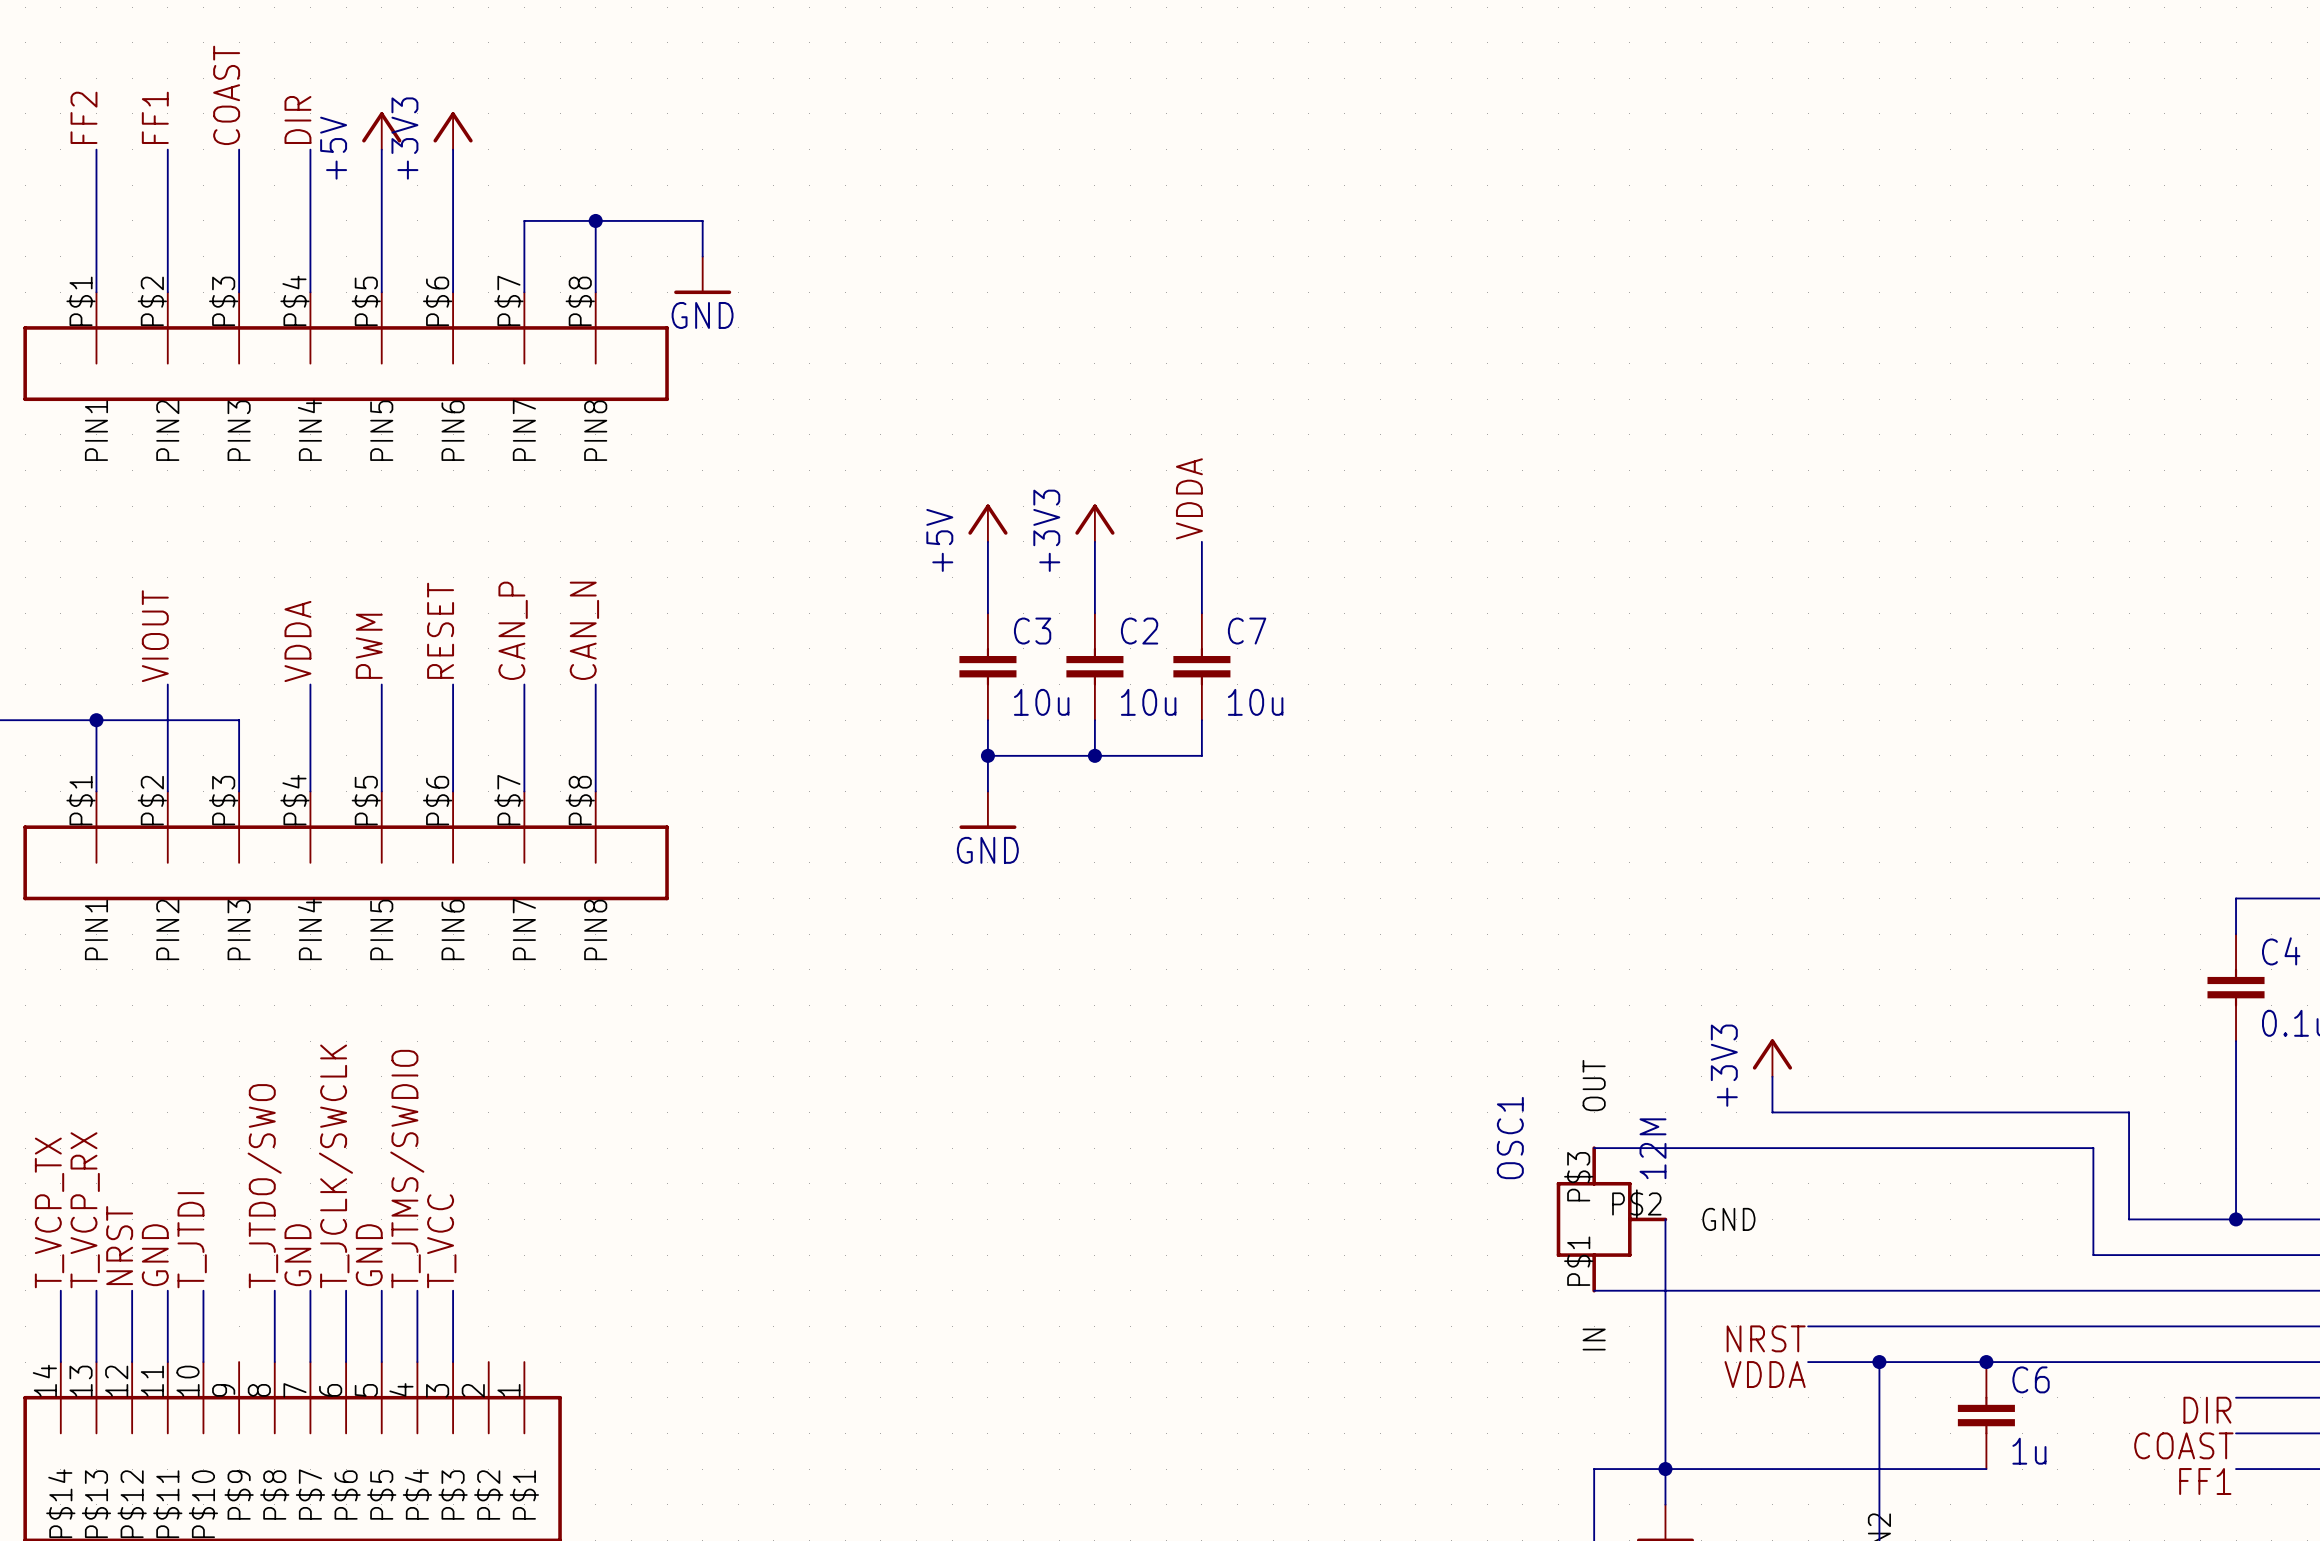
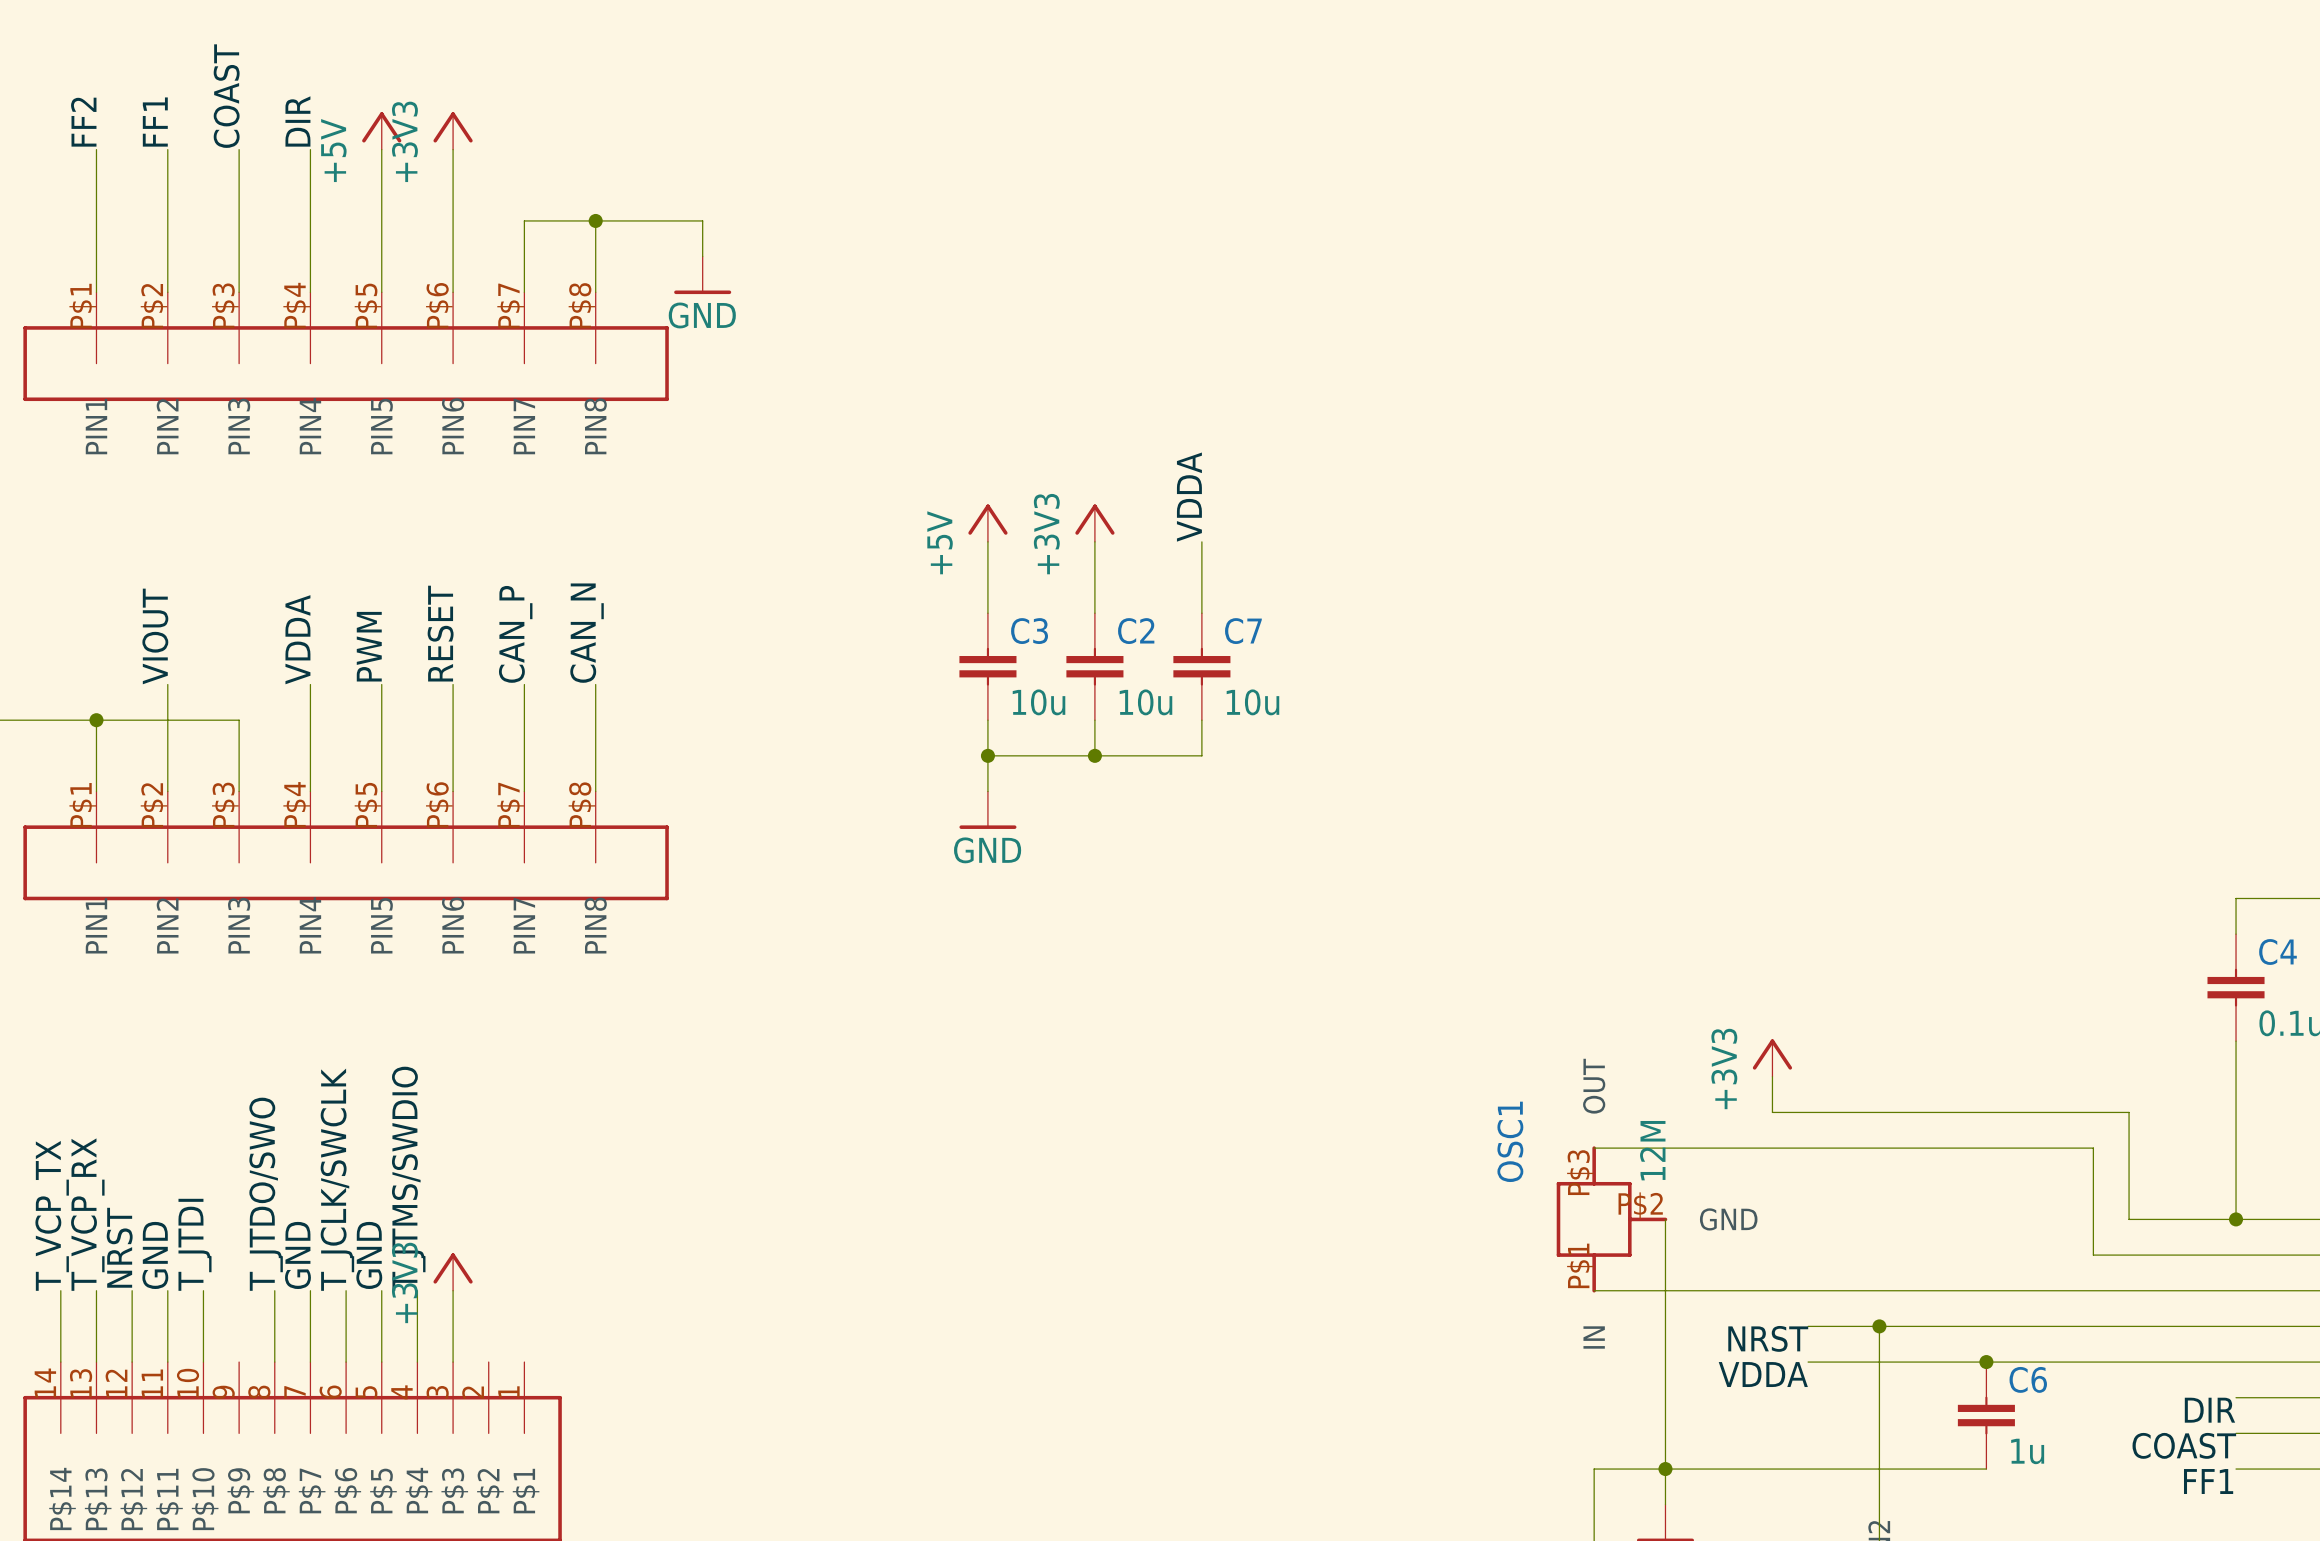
label: T_VCC (441, 1241) -> none
power symbol: none -> +3V3 (453, 1272)
wire: none -> (1879, 1326) (1879, 1362)
junction position: (1879, 1362) -> (1879, 1326)

